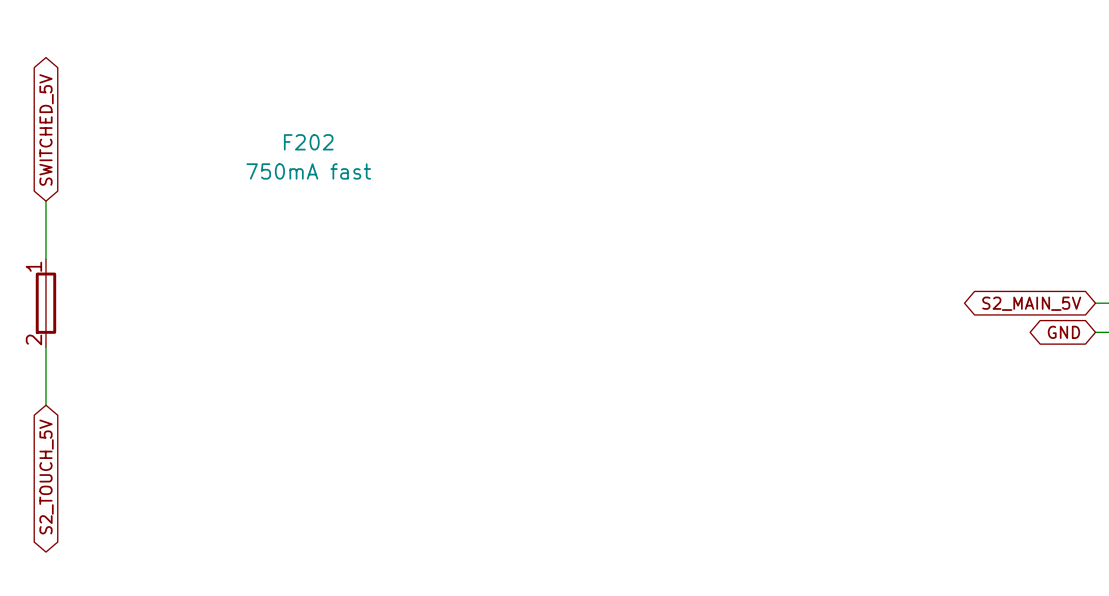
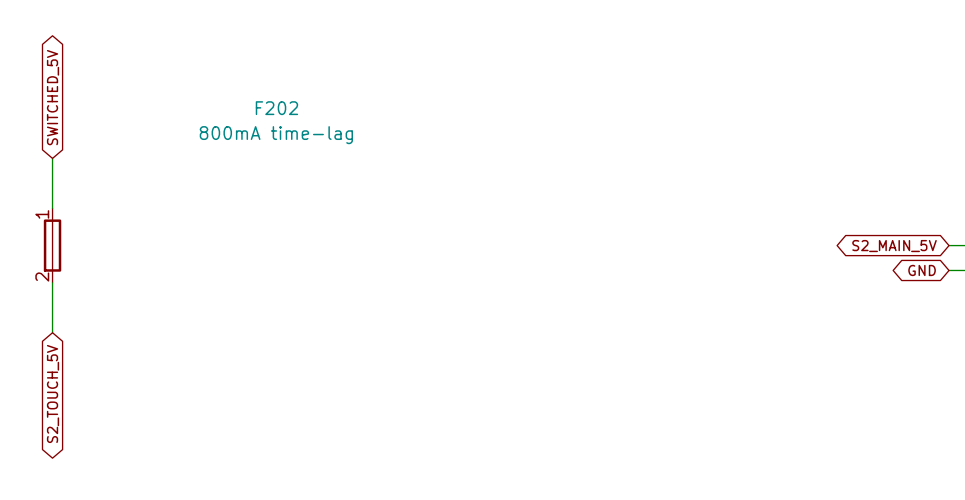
F202 value: 750mA fast (308, 171) -> 800mA time-lag (276, 135)

